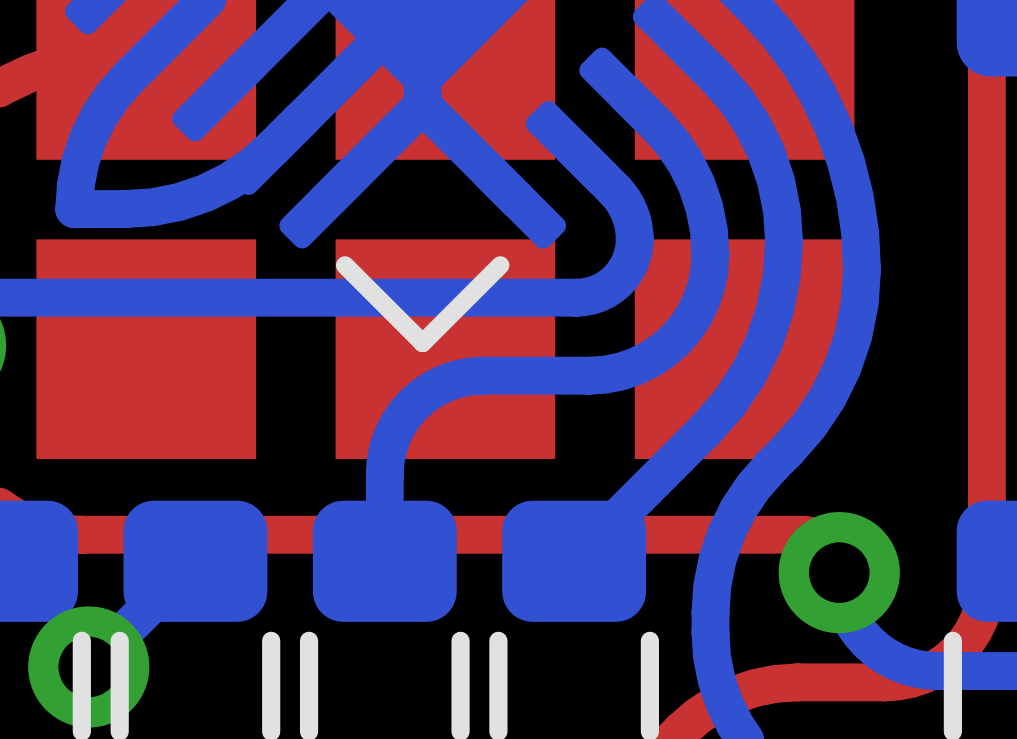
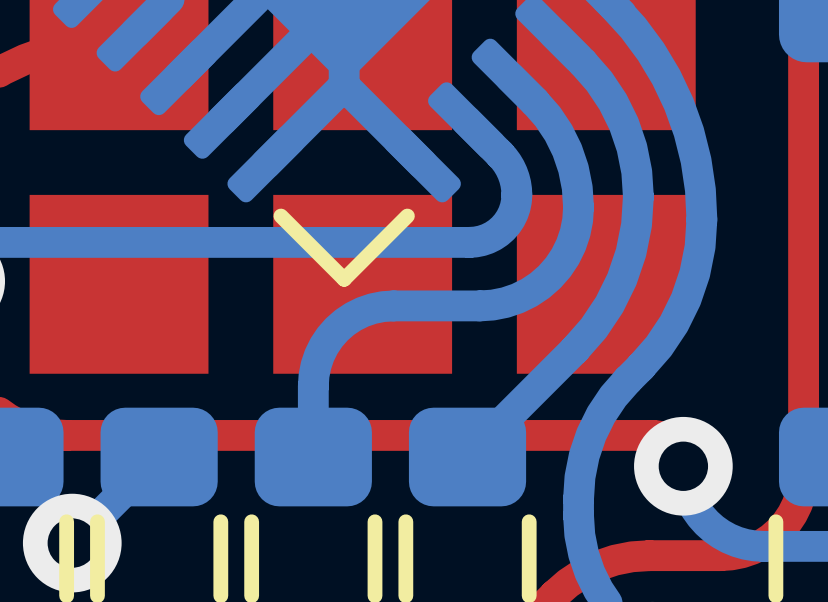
bottom track: (165, 40) (128, 77) (112, 96) (99, 116) (88, 138) (80, 161) (75, 184) (74, 209) (152, 207) (179, 201) (205, 193) (229, 181) (252, 165) (272, 148) -> none

